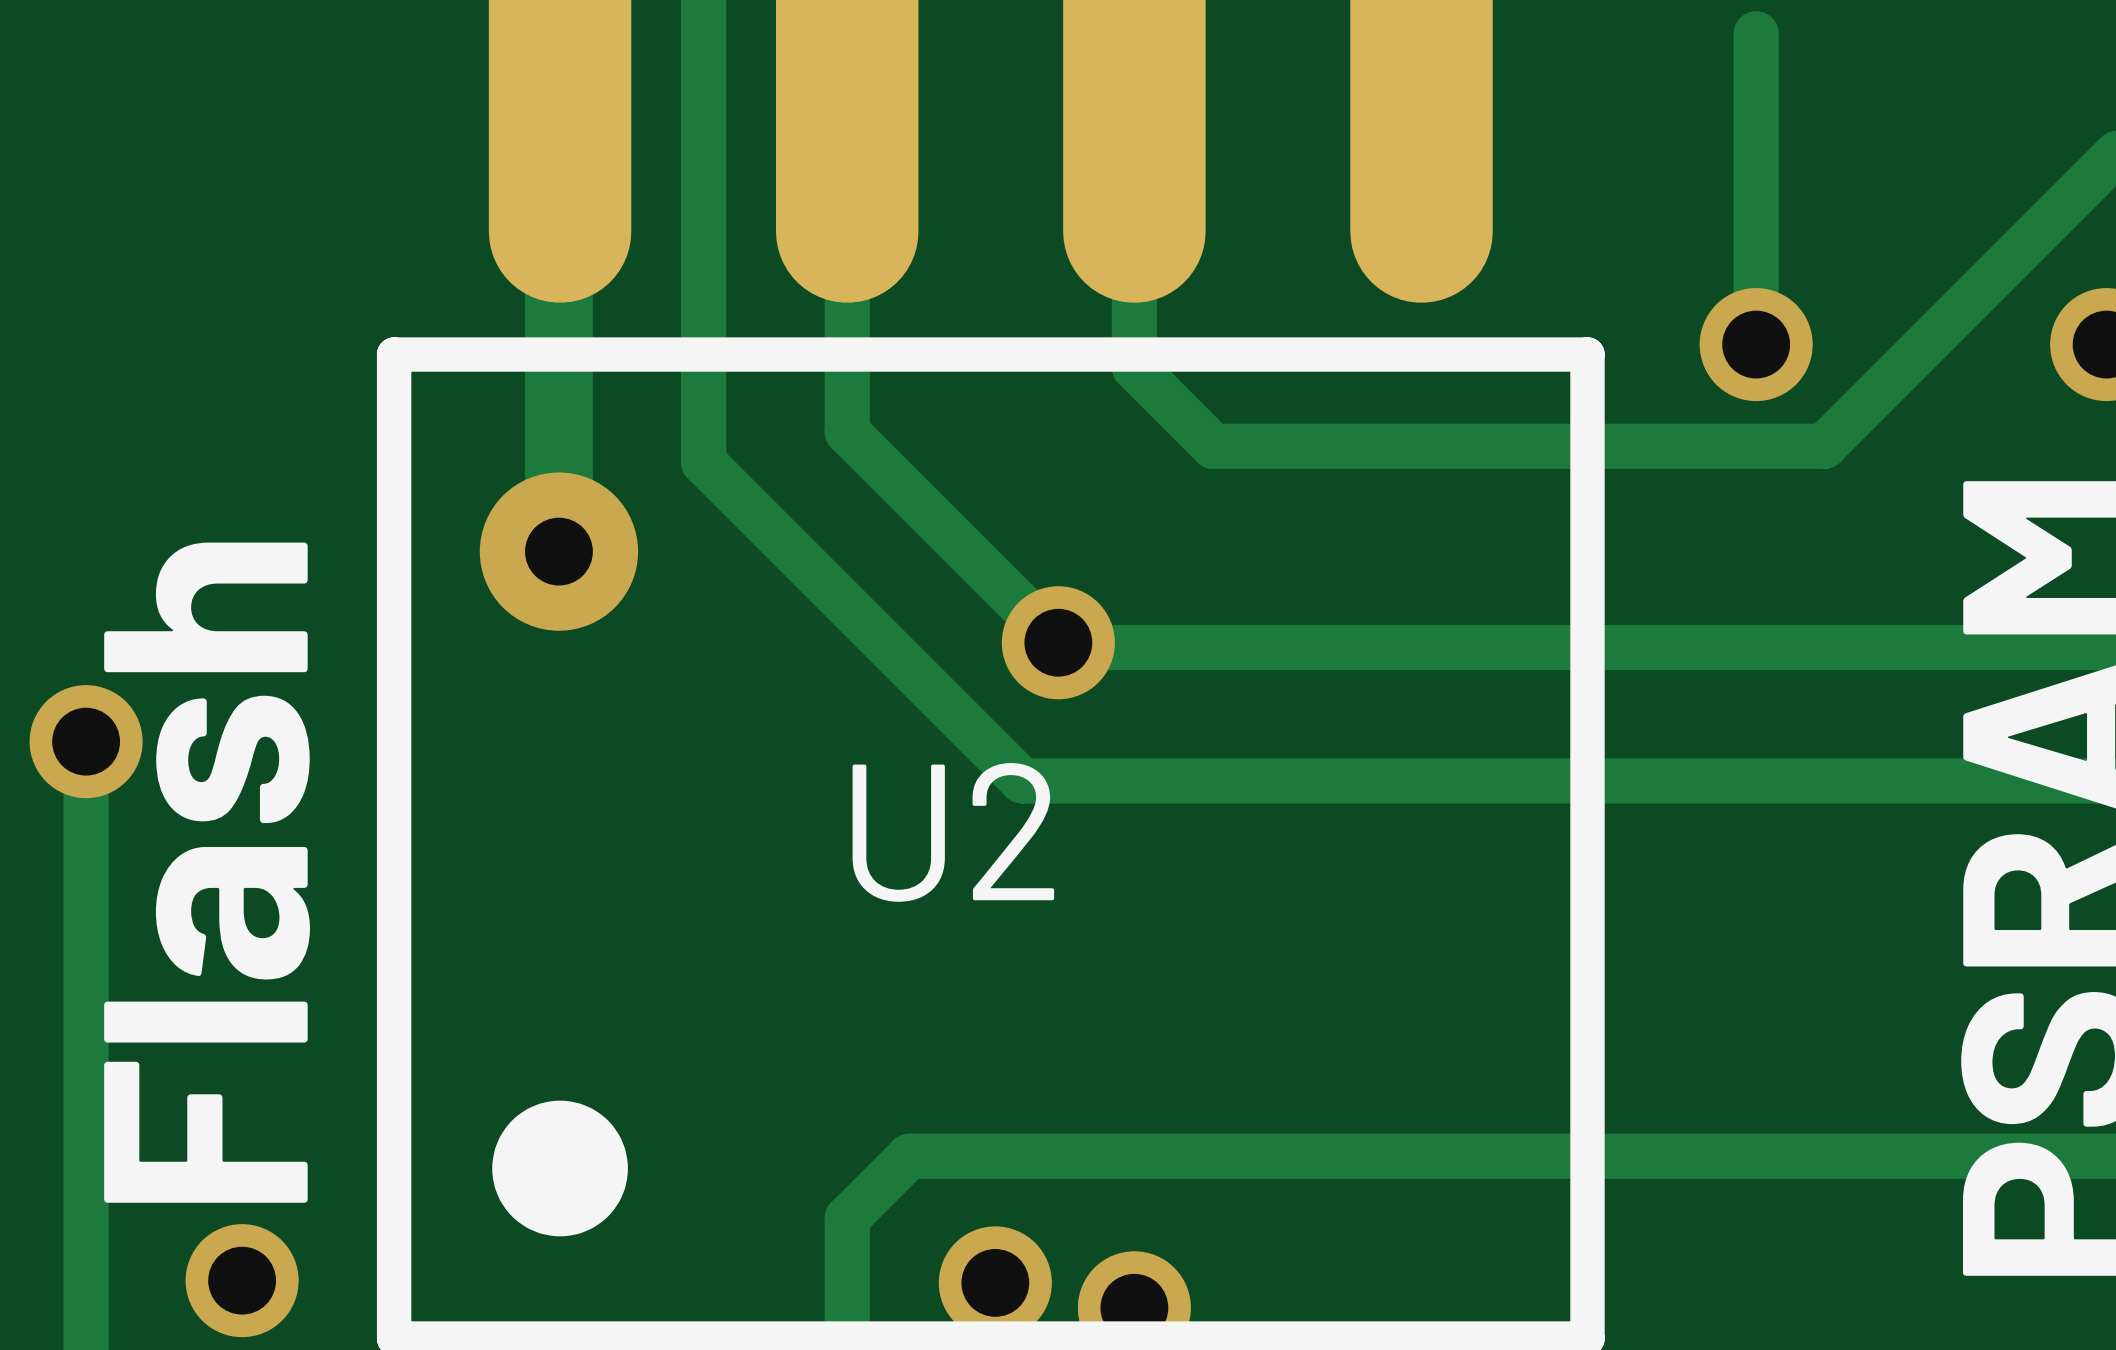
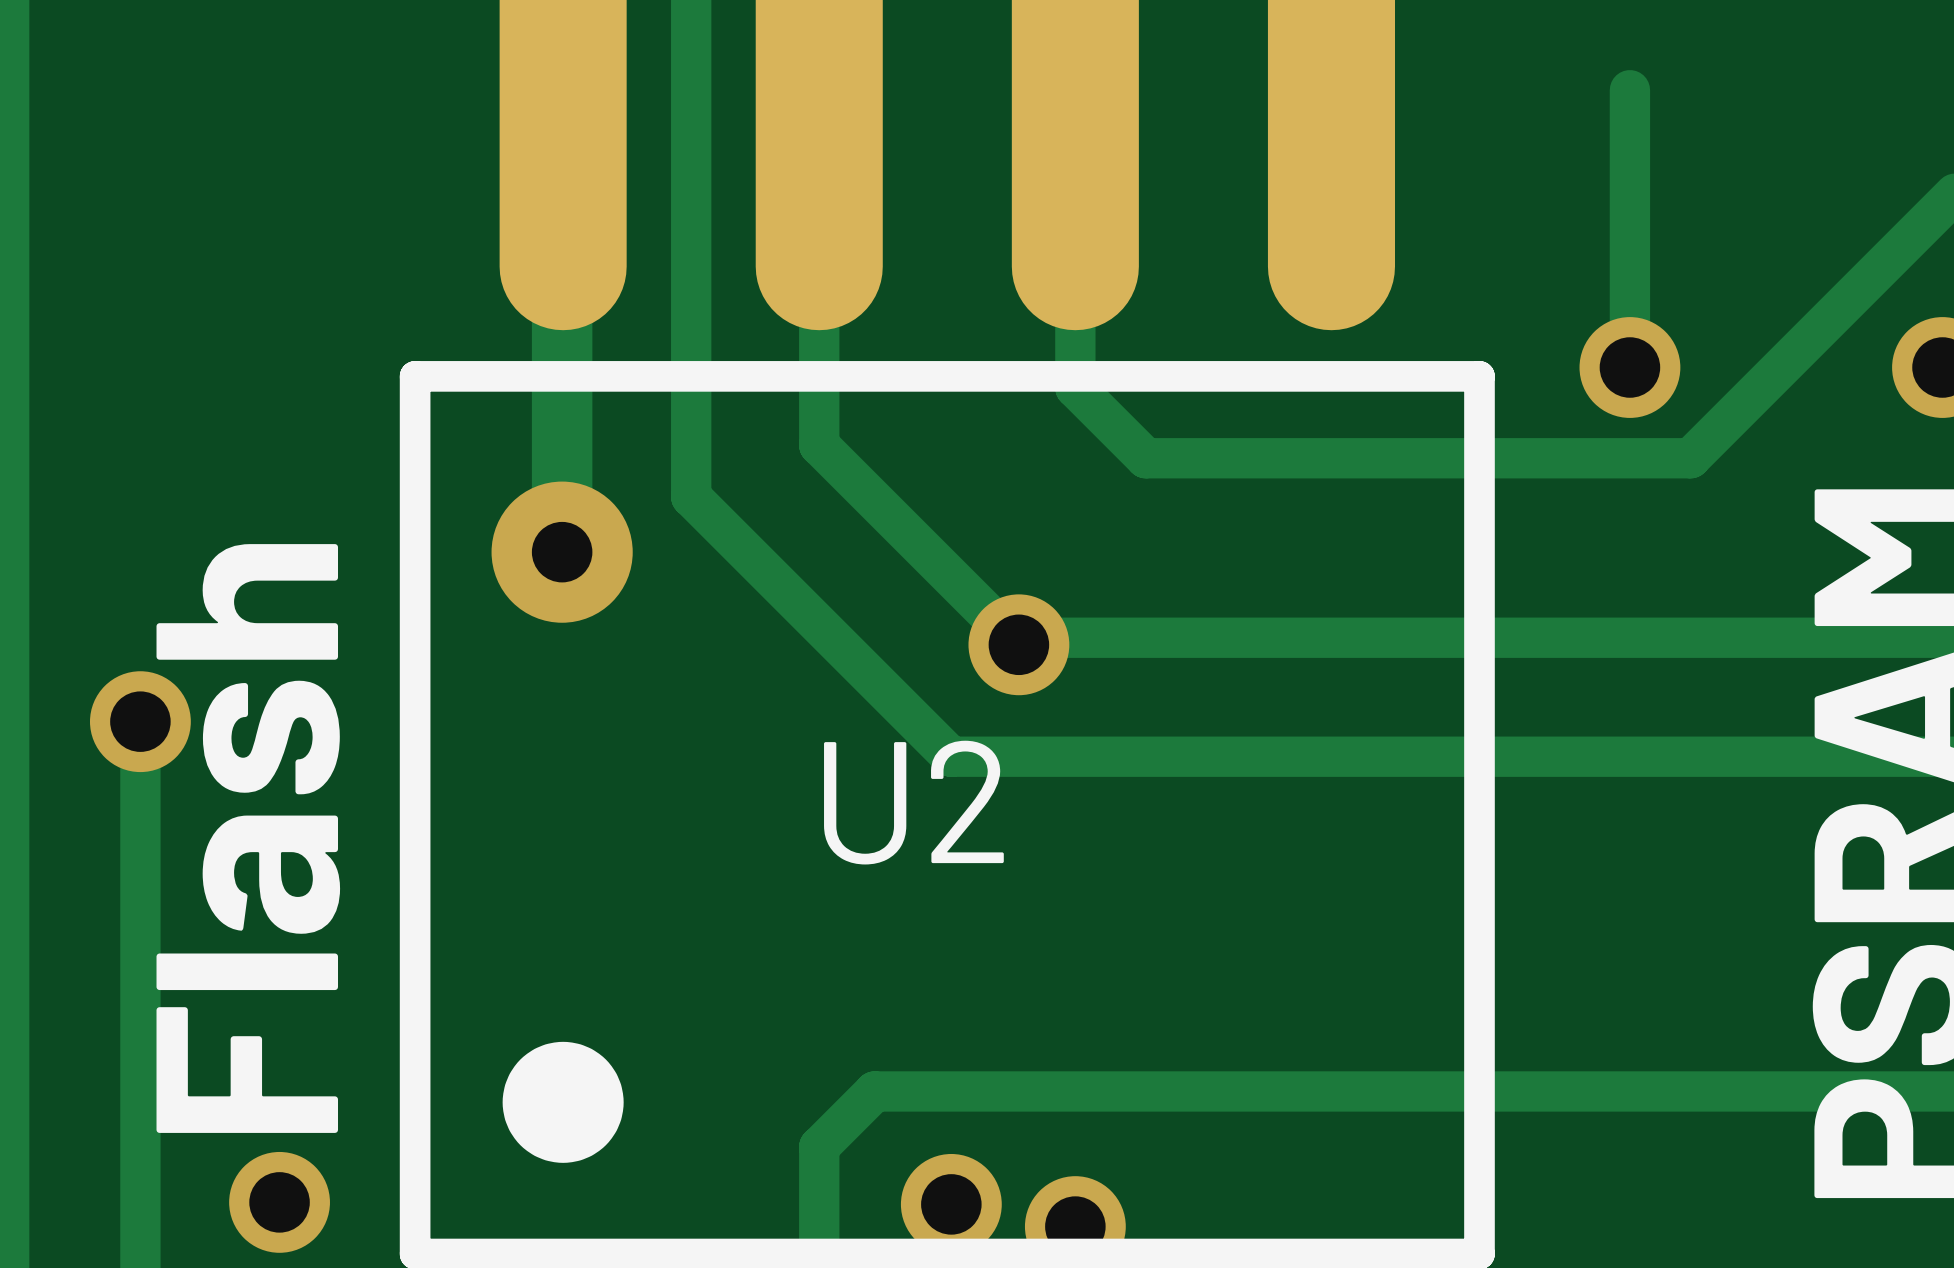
track: (703, 462) (1022, 780) -> (691, 472) (691, 496) (951, 756) (975, 756)
via position: (1058, 642) -> (1018, 644)

